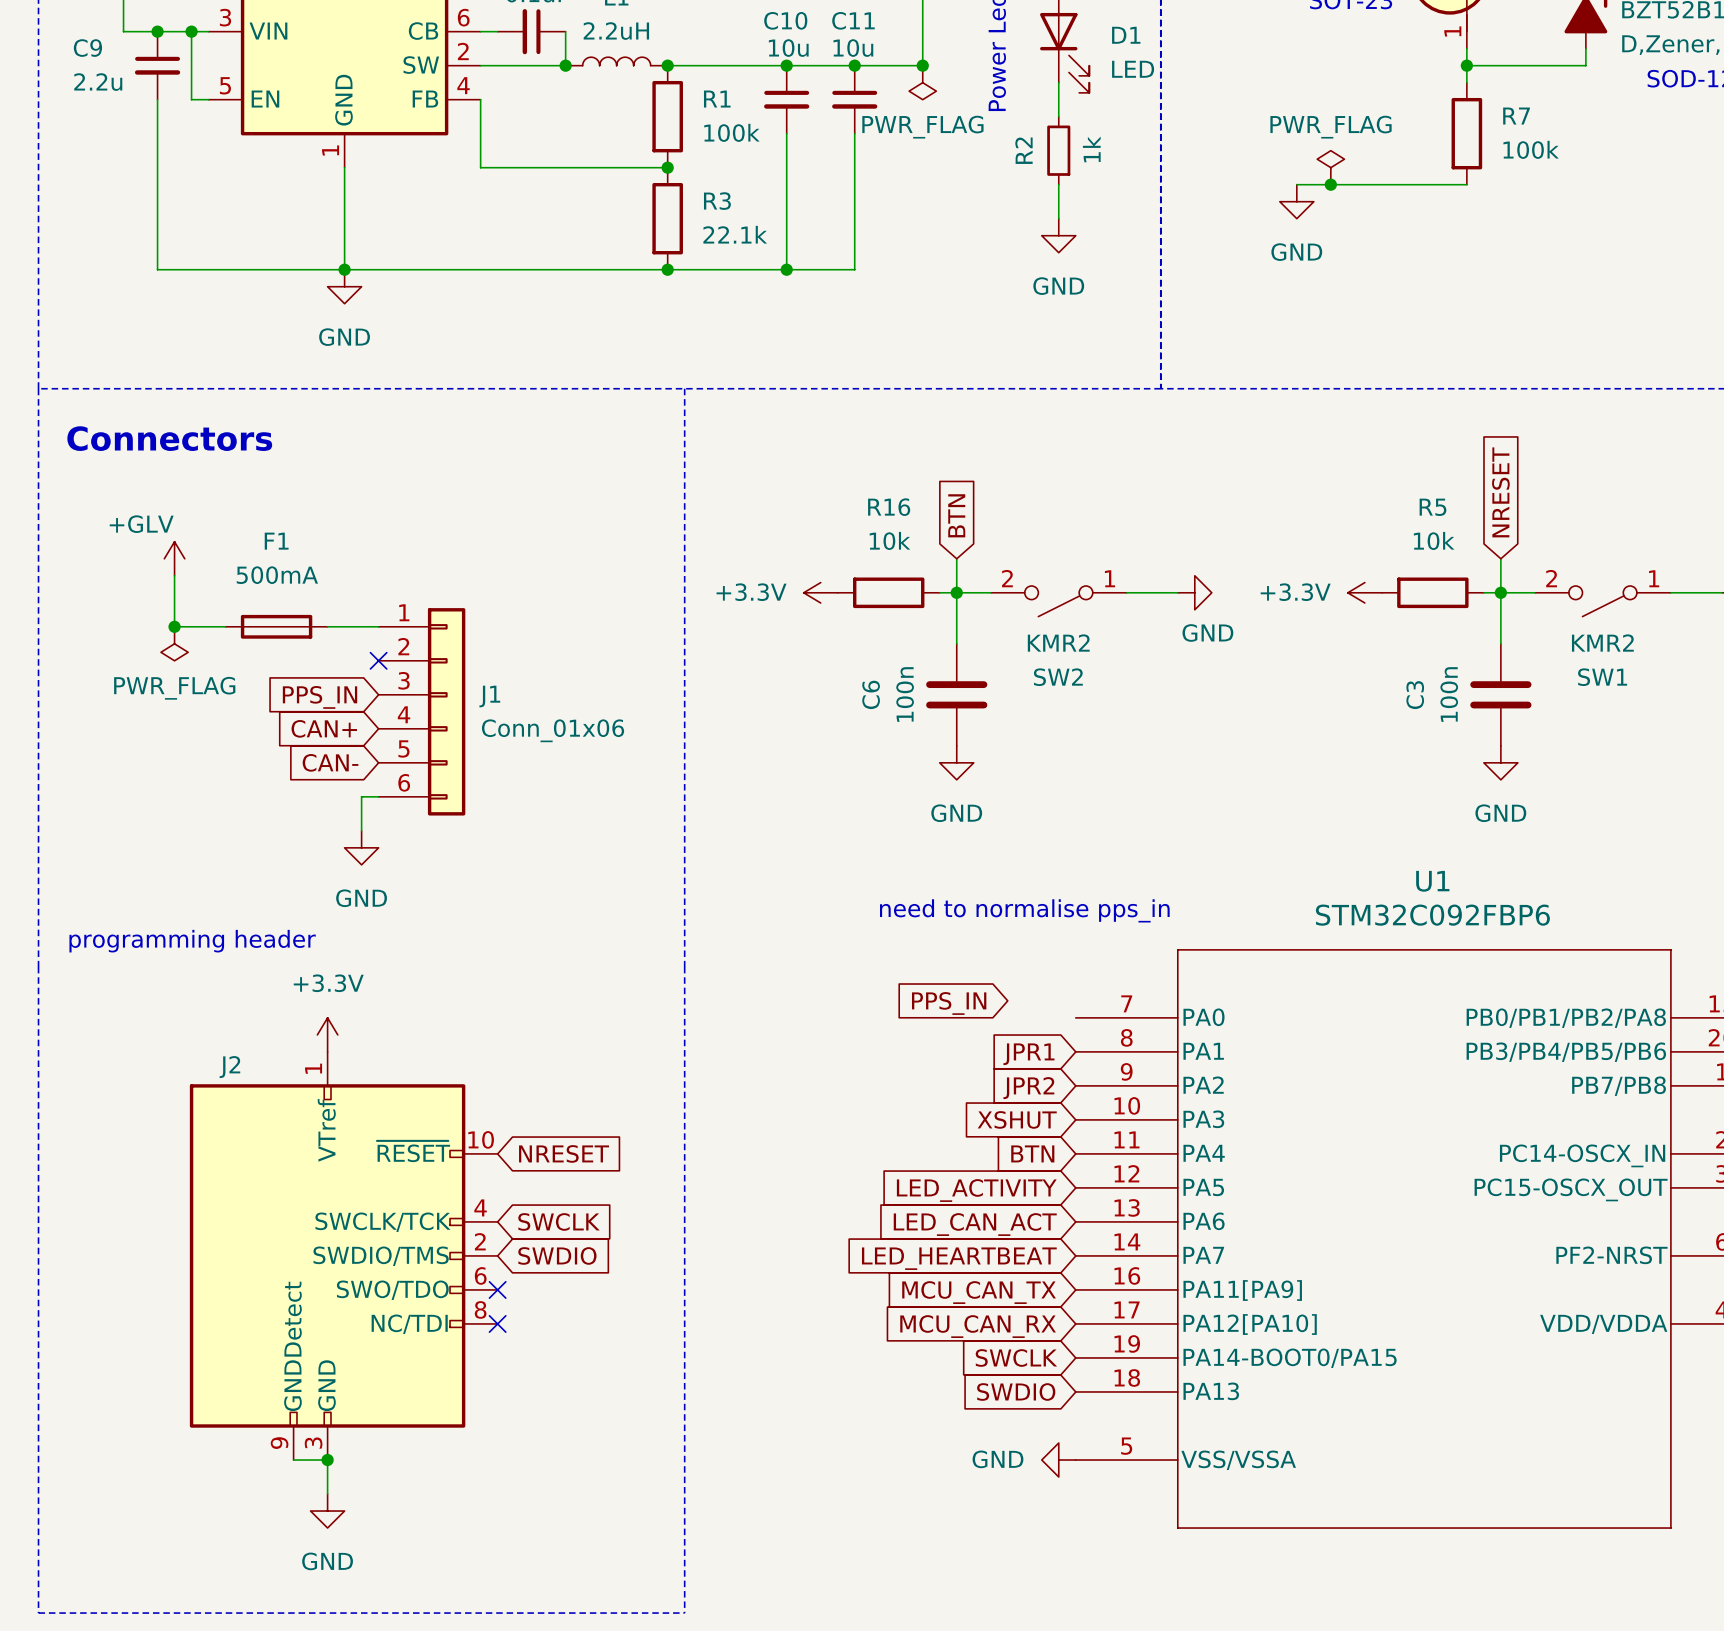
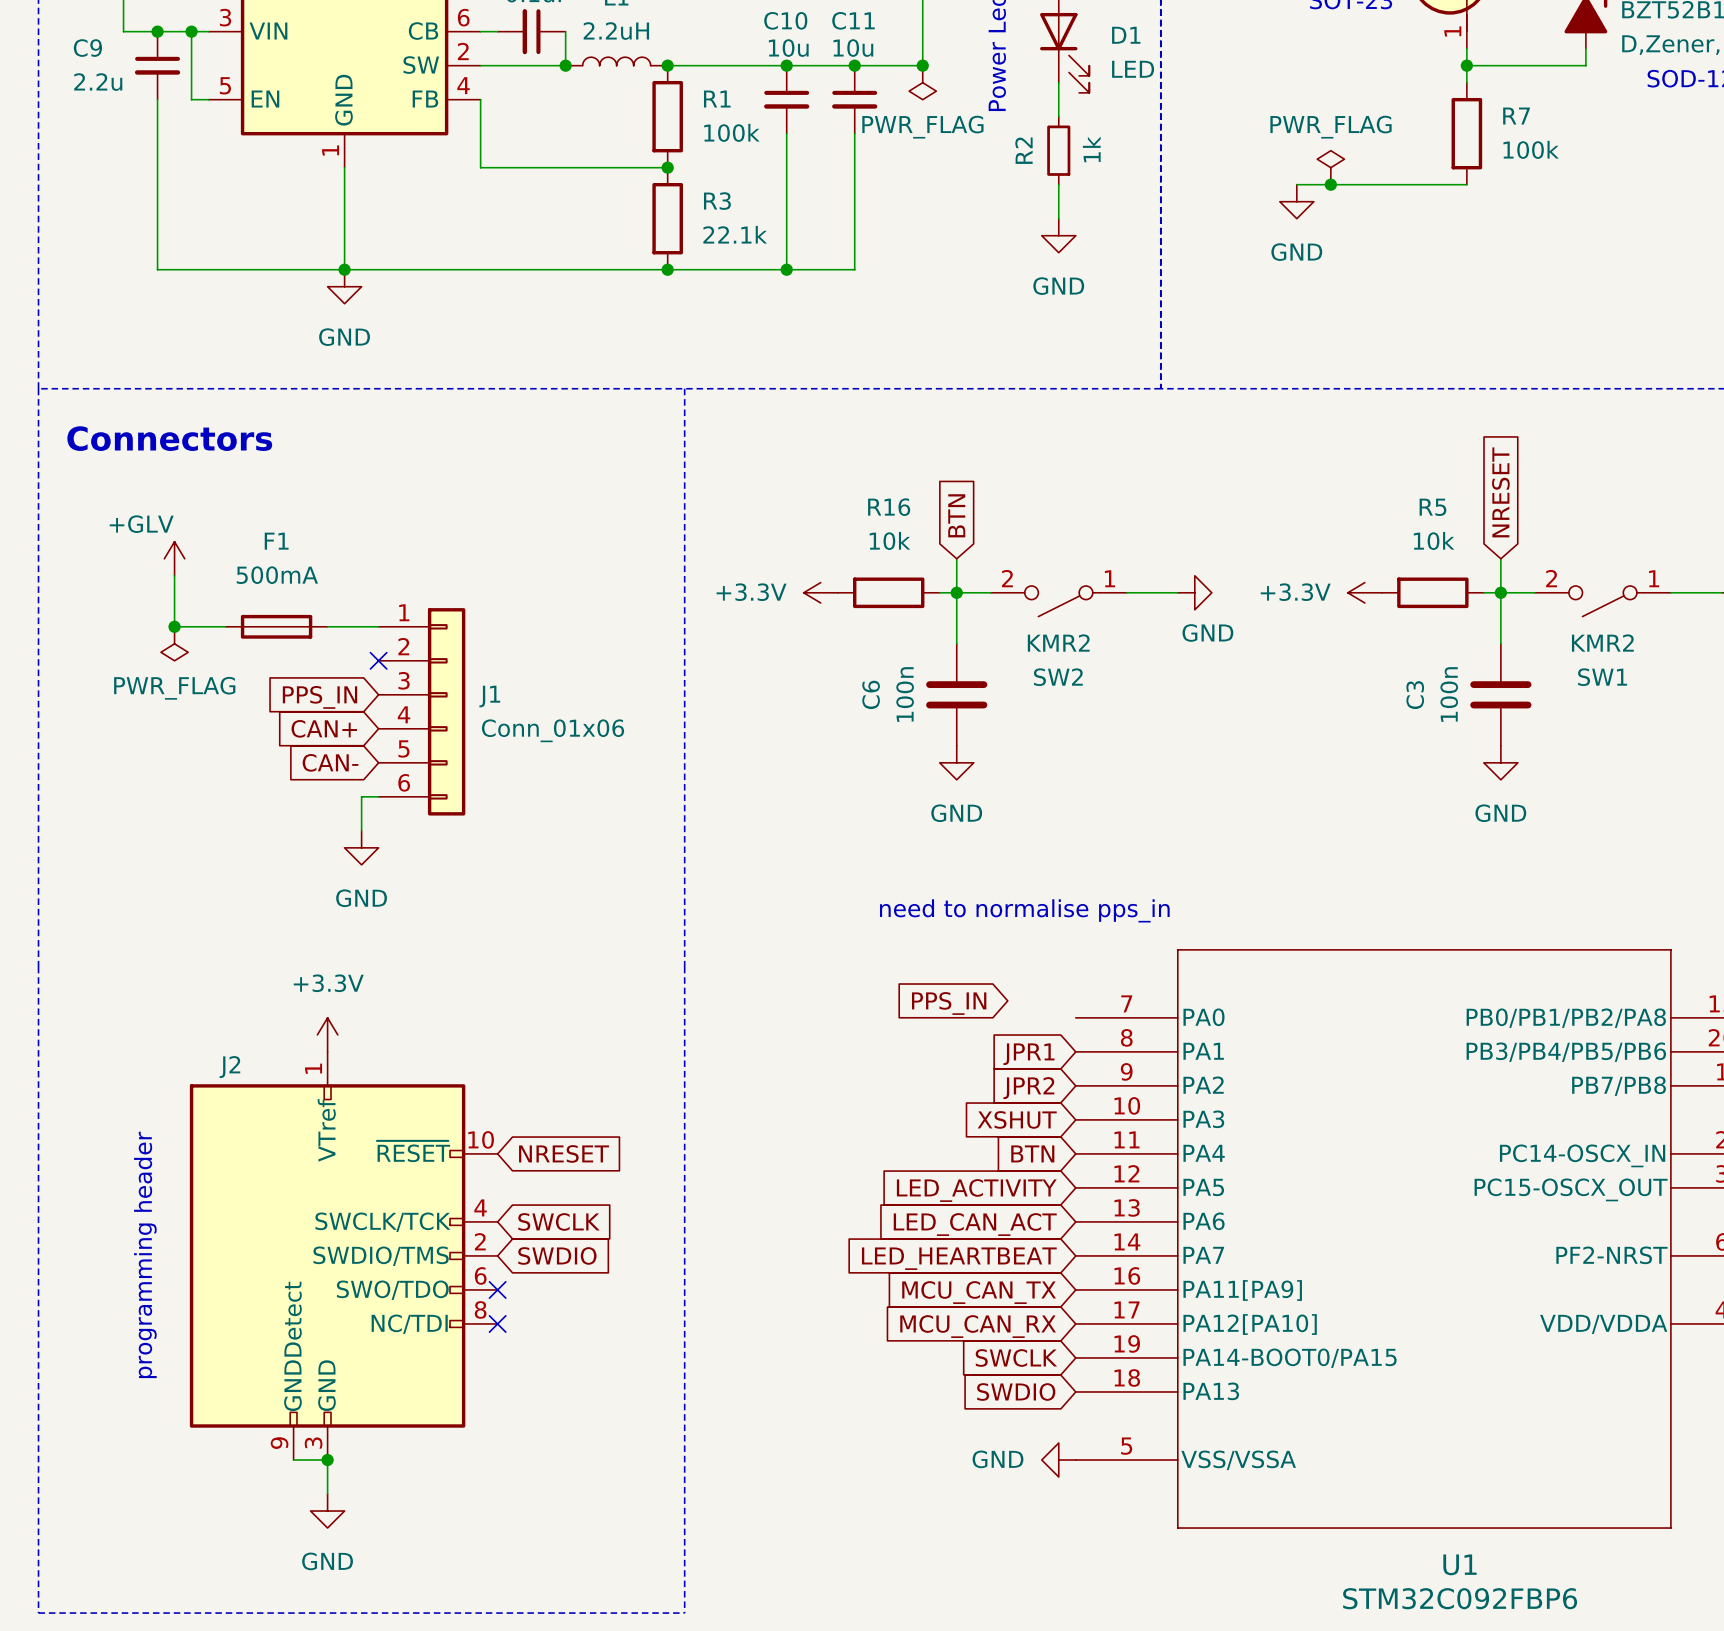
U1 name position: U1 (1432, 881) -> U1 (1459, 1564)
U1 value position: STM32C092FBP6 (1432, 915) -> STM32C092FBP6 (1460, 1598)
text rotation: 0° (192, 941) -> 90° counterclockwise (145, 1254)
text position: programming header (192, 941) -> programming header (145, 1254)

